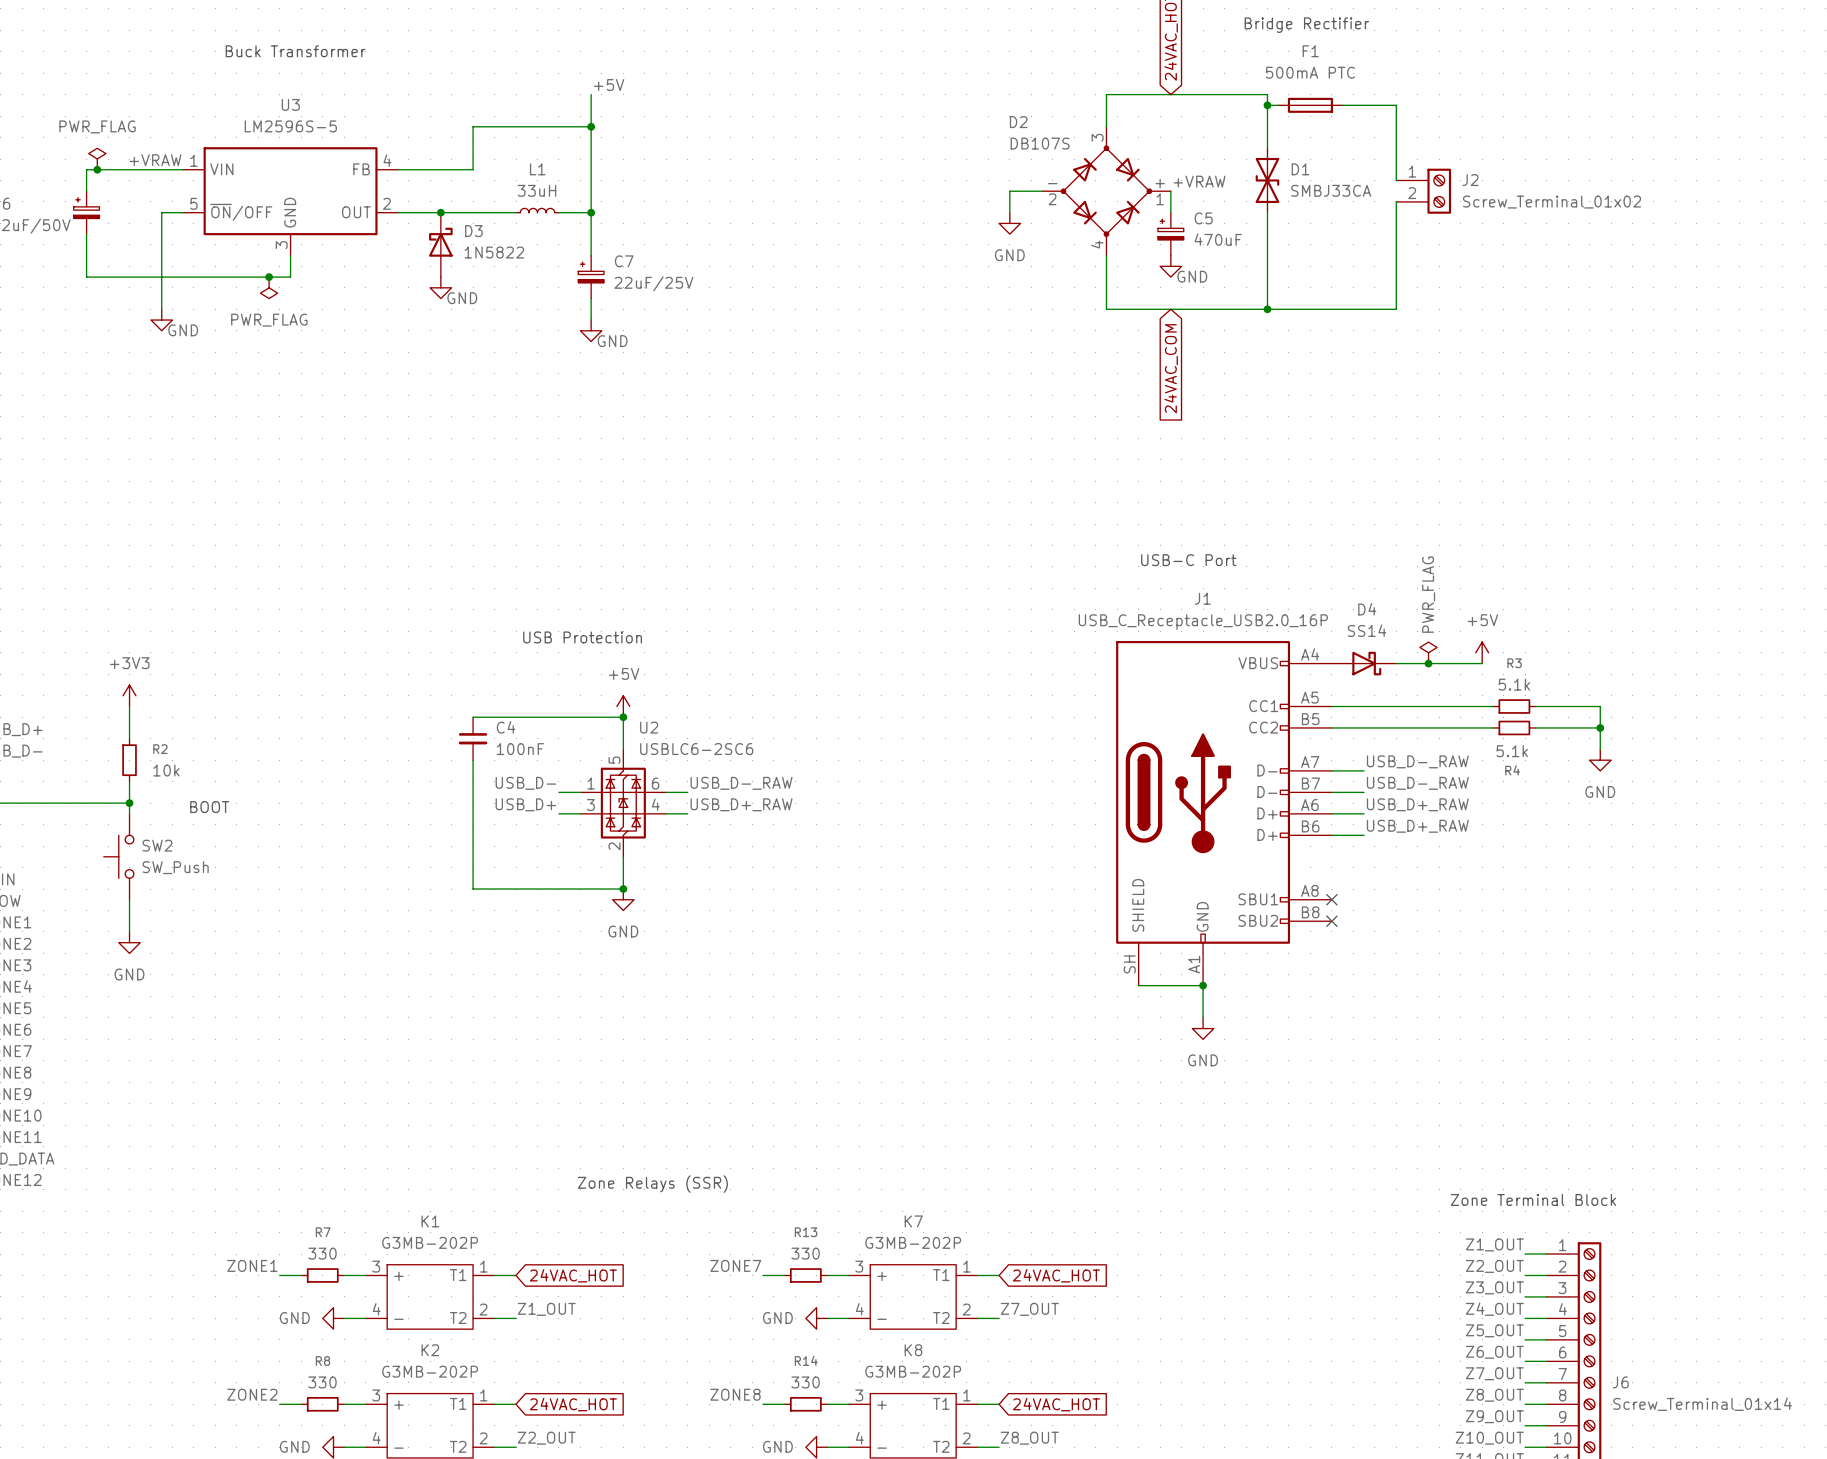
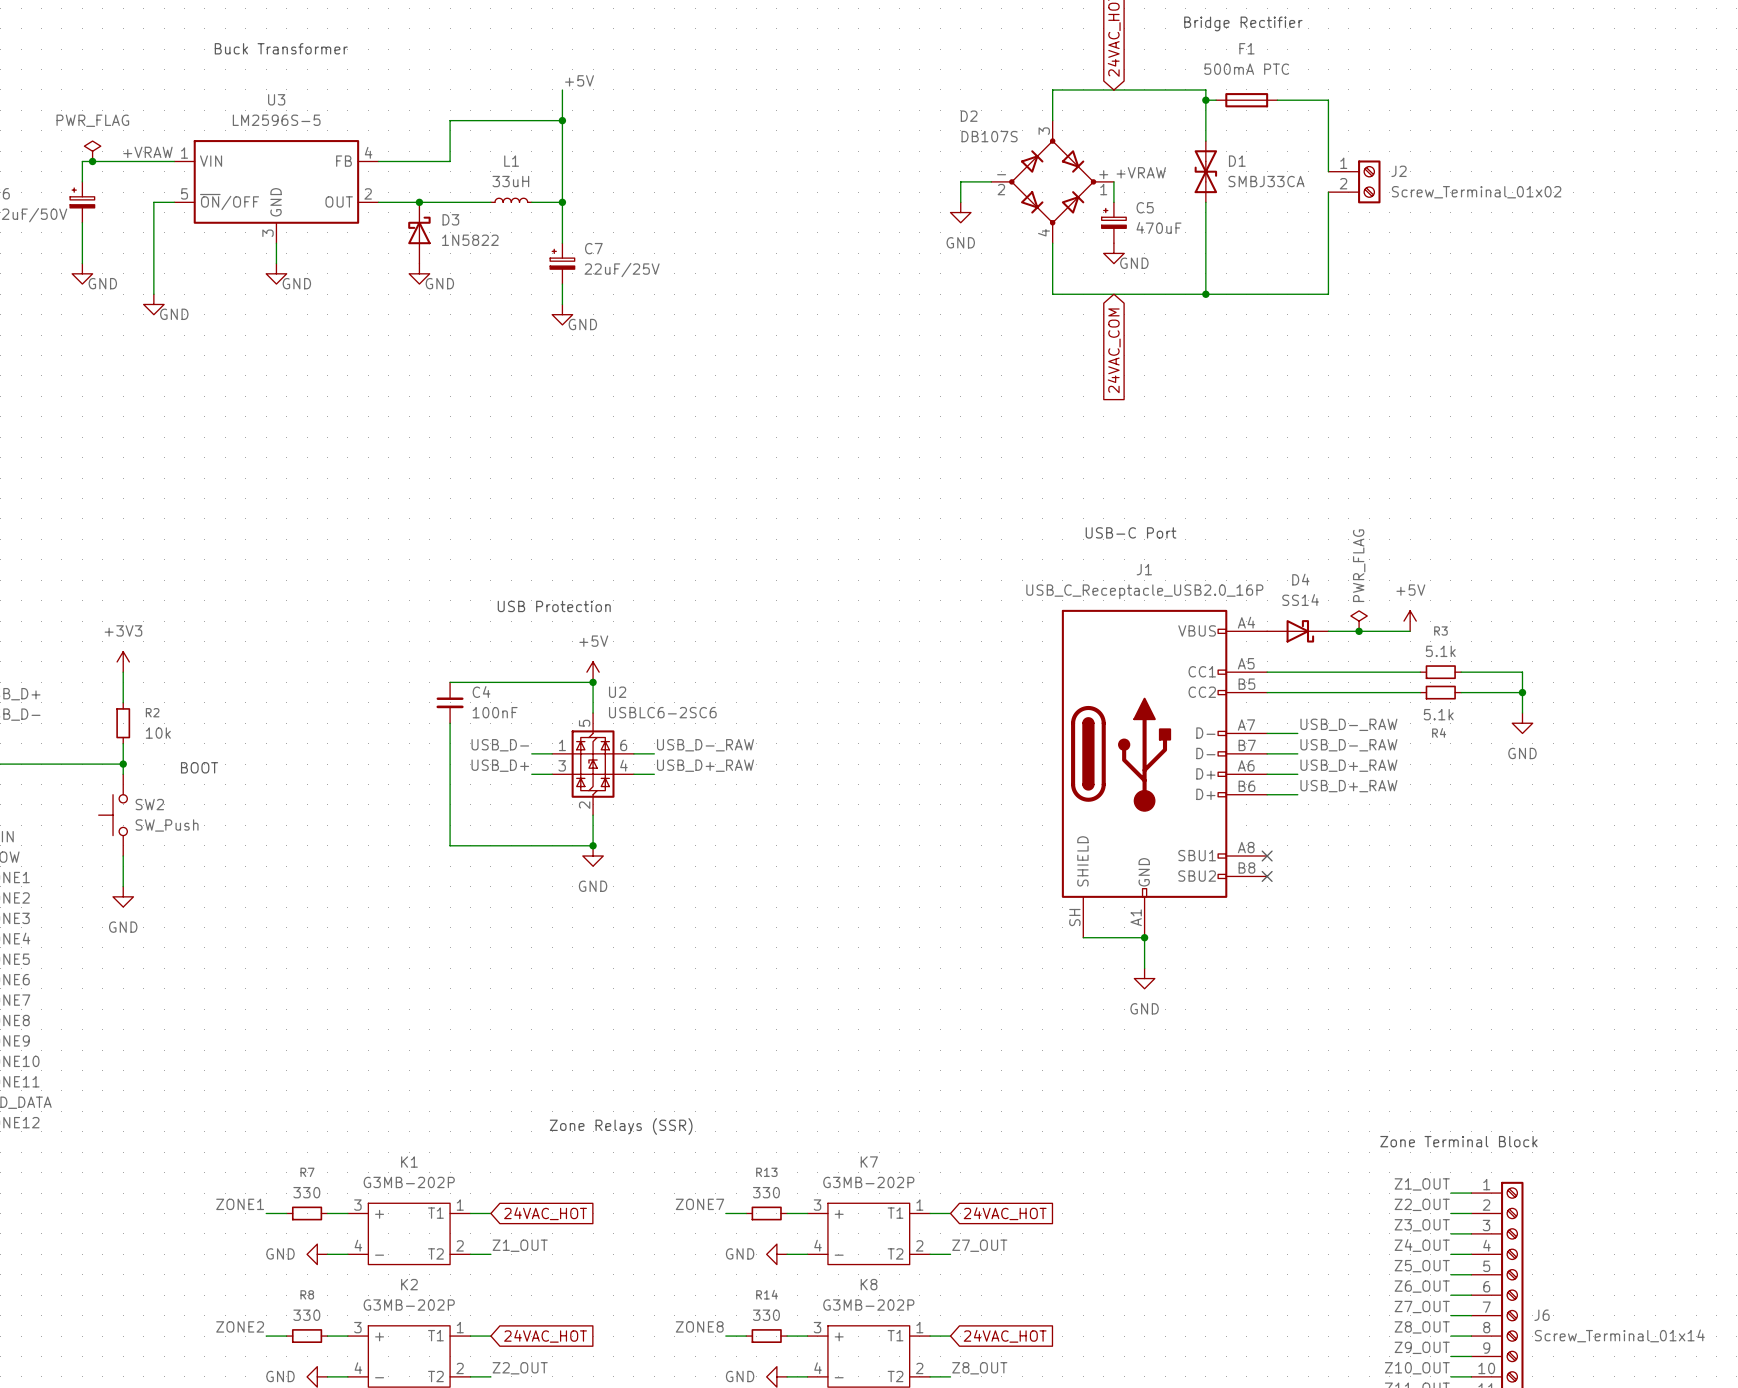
wire: (86, 277) (290, 277) -> none
junction: (269, 277) -> none
power symbol: none -> GND (82, 273)
power symbol: PWR_FLAG (269, 287) -> none
power symbol: none -> GND (276, 273)

